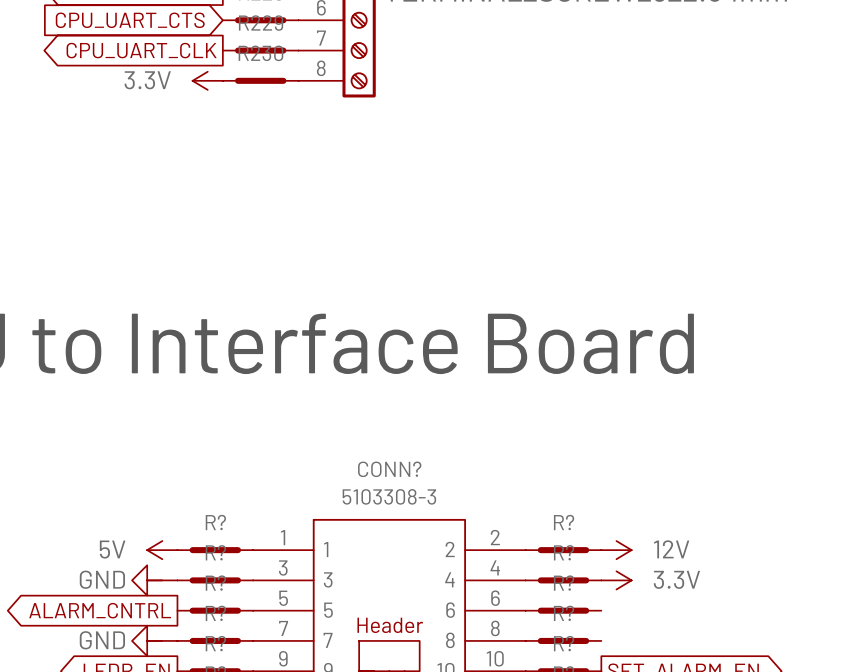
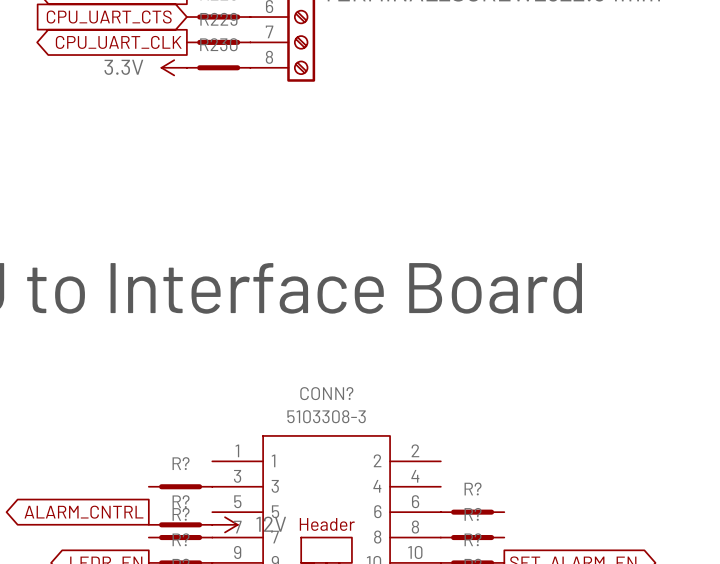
power symbol: 5V (162, 550) -> none
R?: (215, 550) -> none
R?: (563, 550) -> none
power symbol: 12V (616, 550) -> none
power symbol: GND (154, 580) -> none
R?: (563, 580) -> none
power symbol: 3.3V (616, 580) -> none
R? position: (215, 610) -> (180, 524)
power symbol: none -> 12V (225, 524)
power symbol: GND (154, 640) -> none

